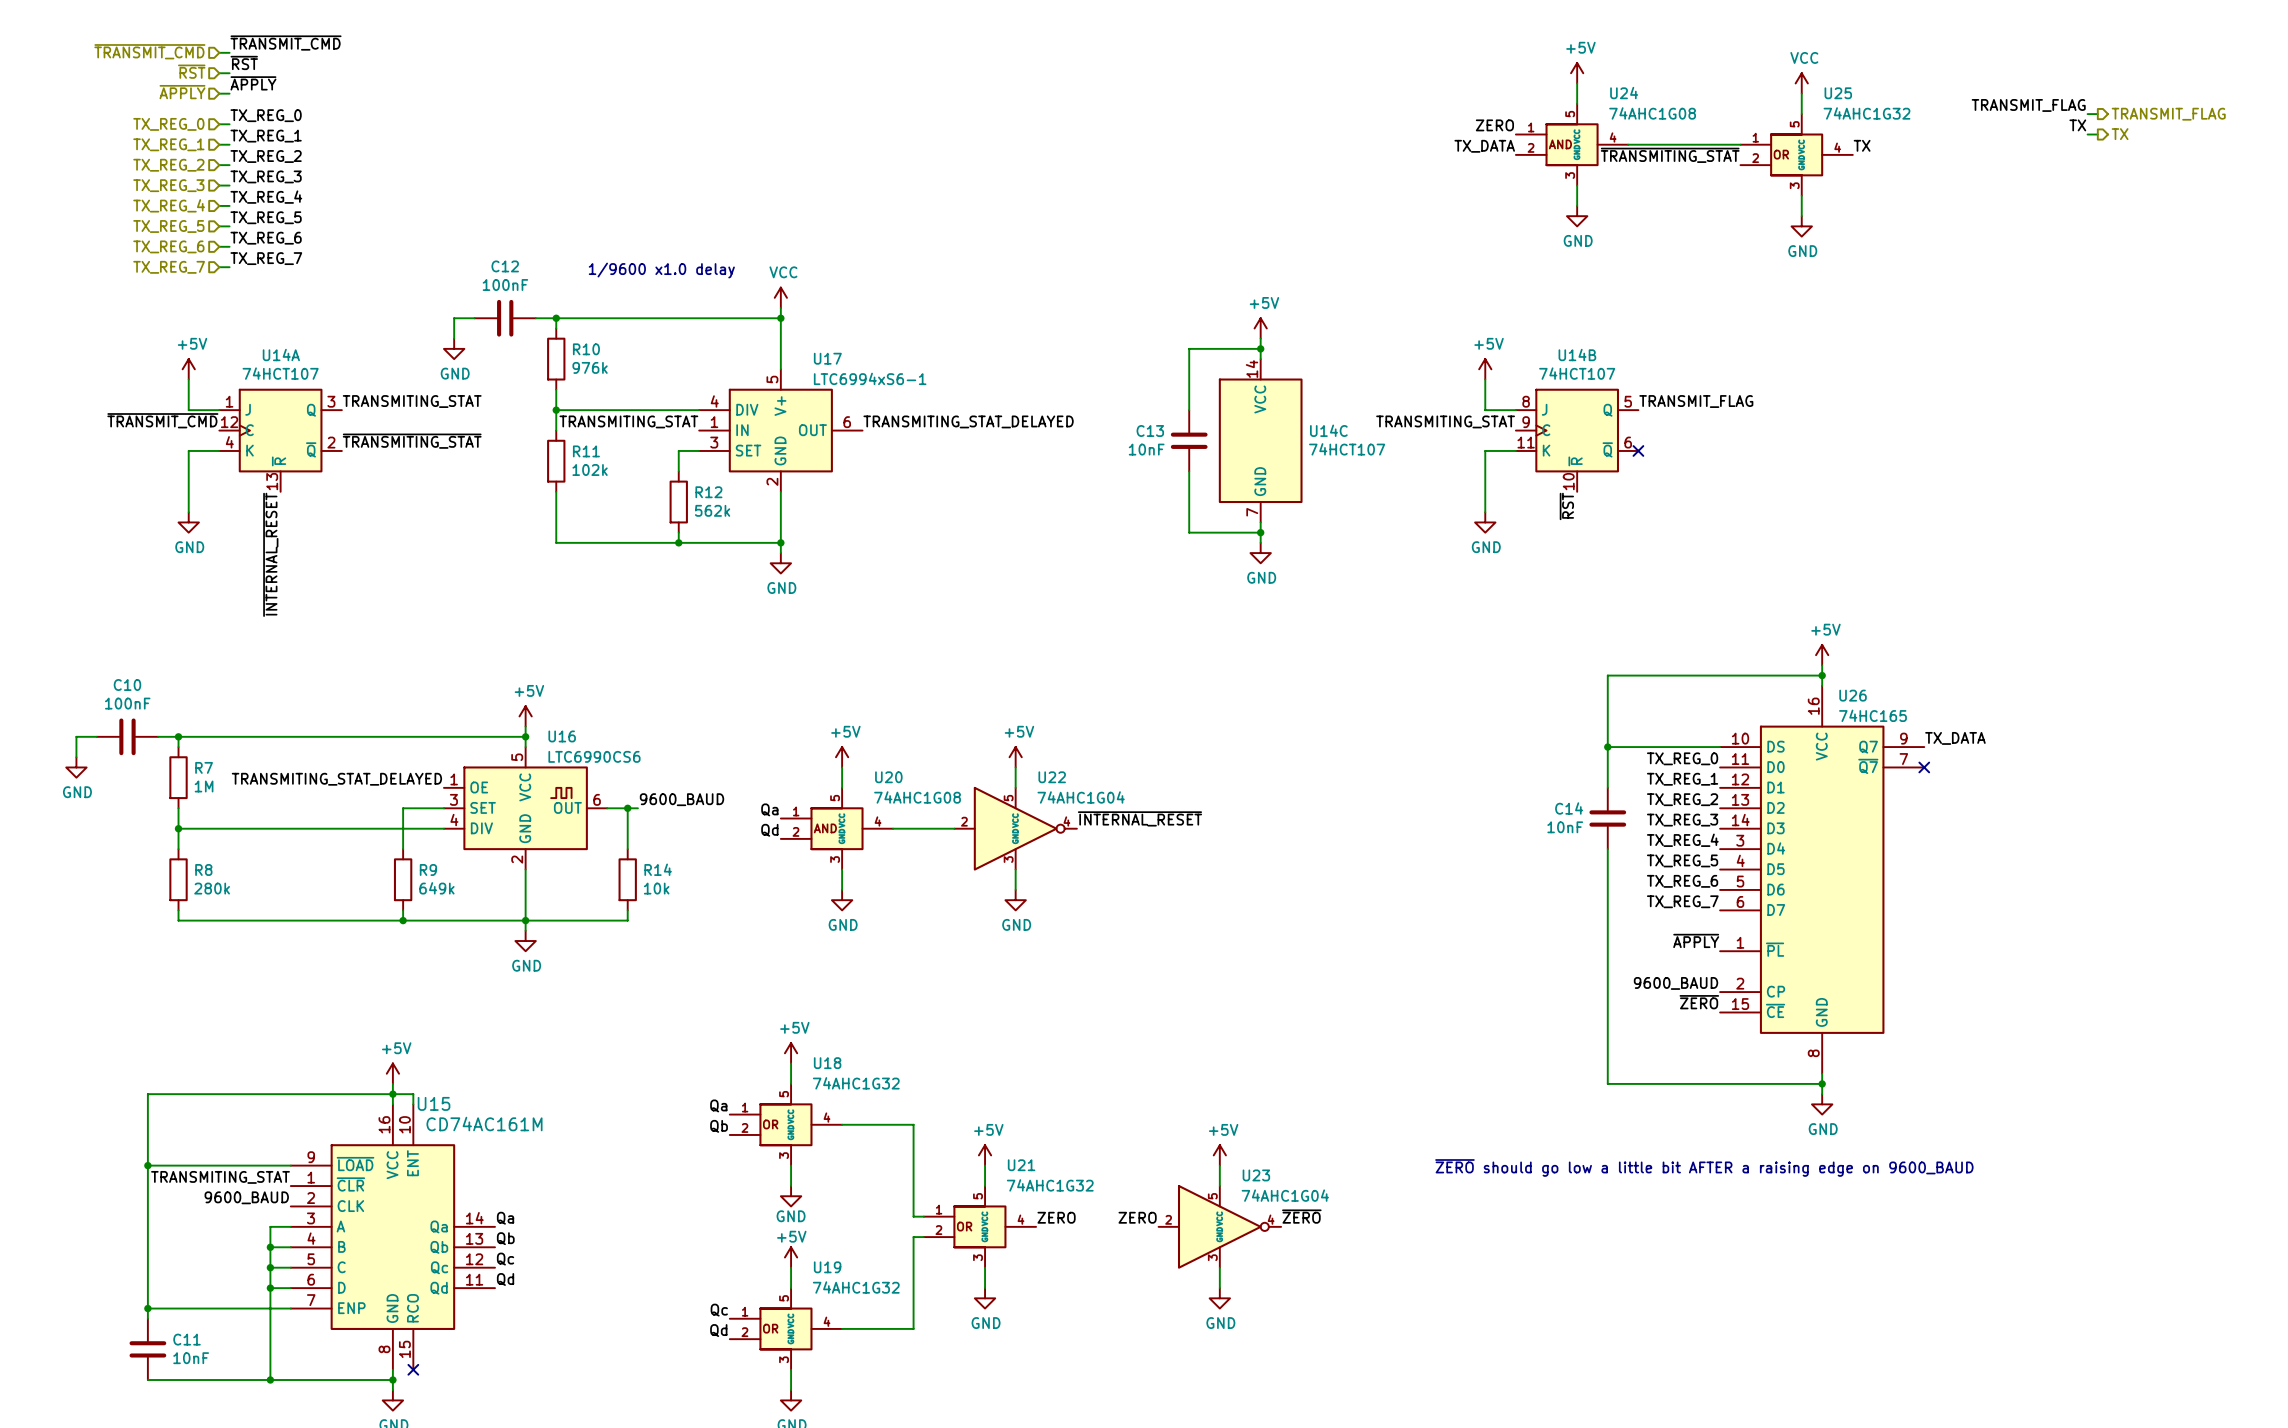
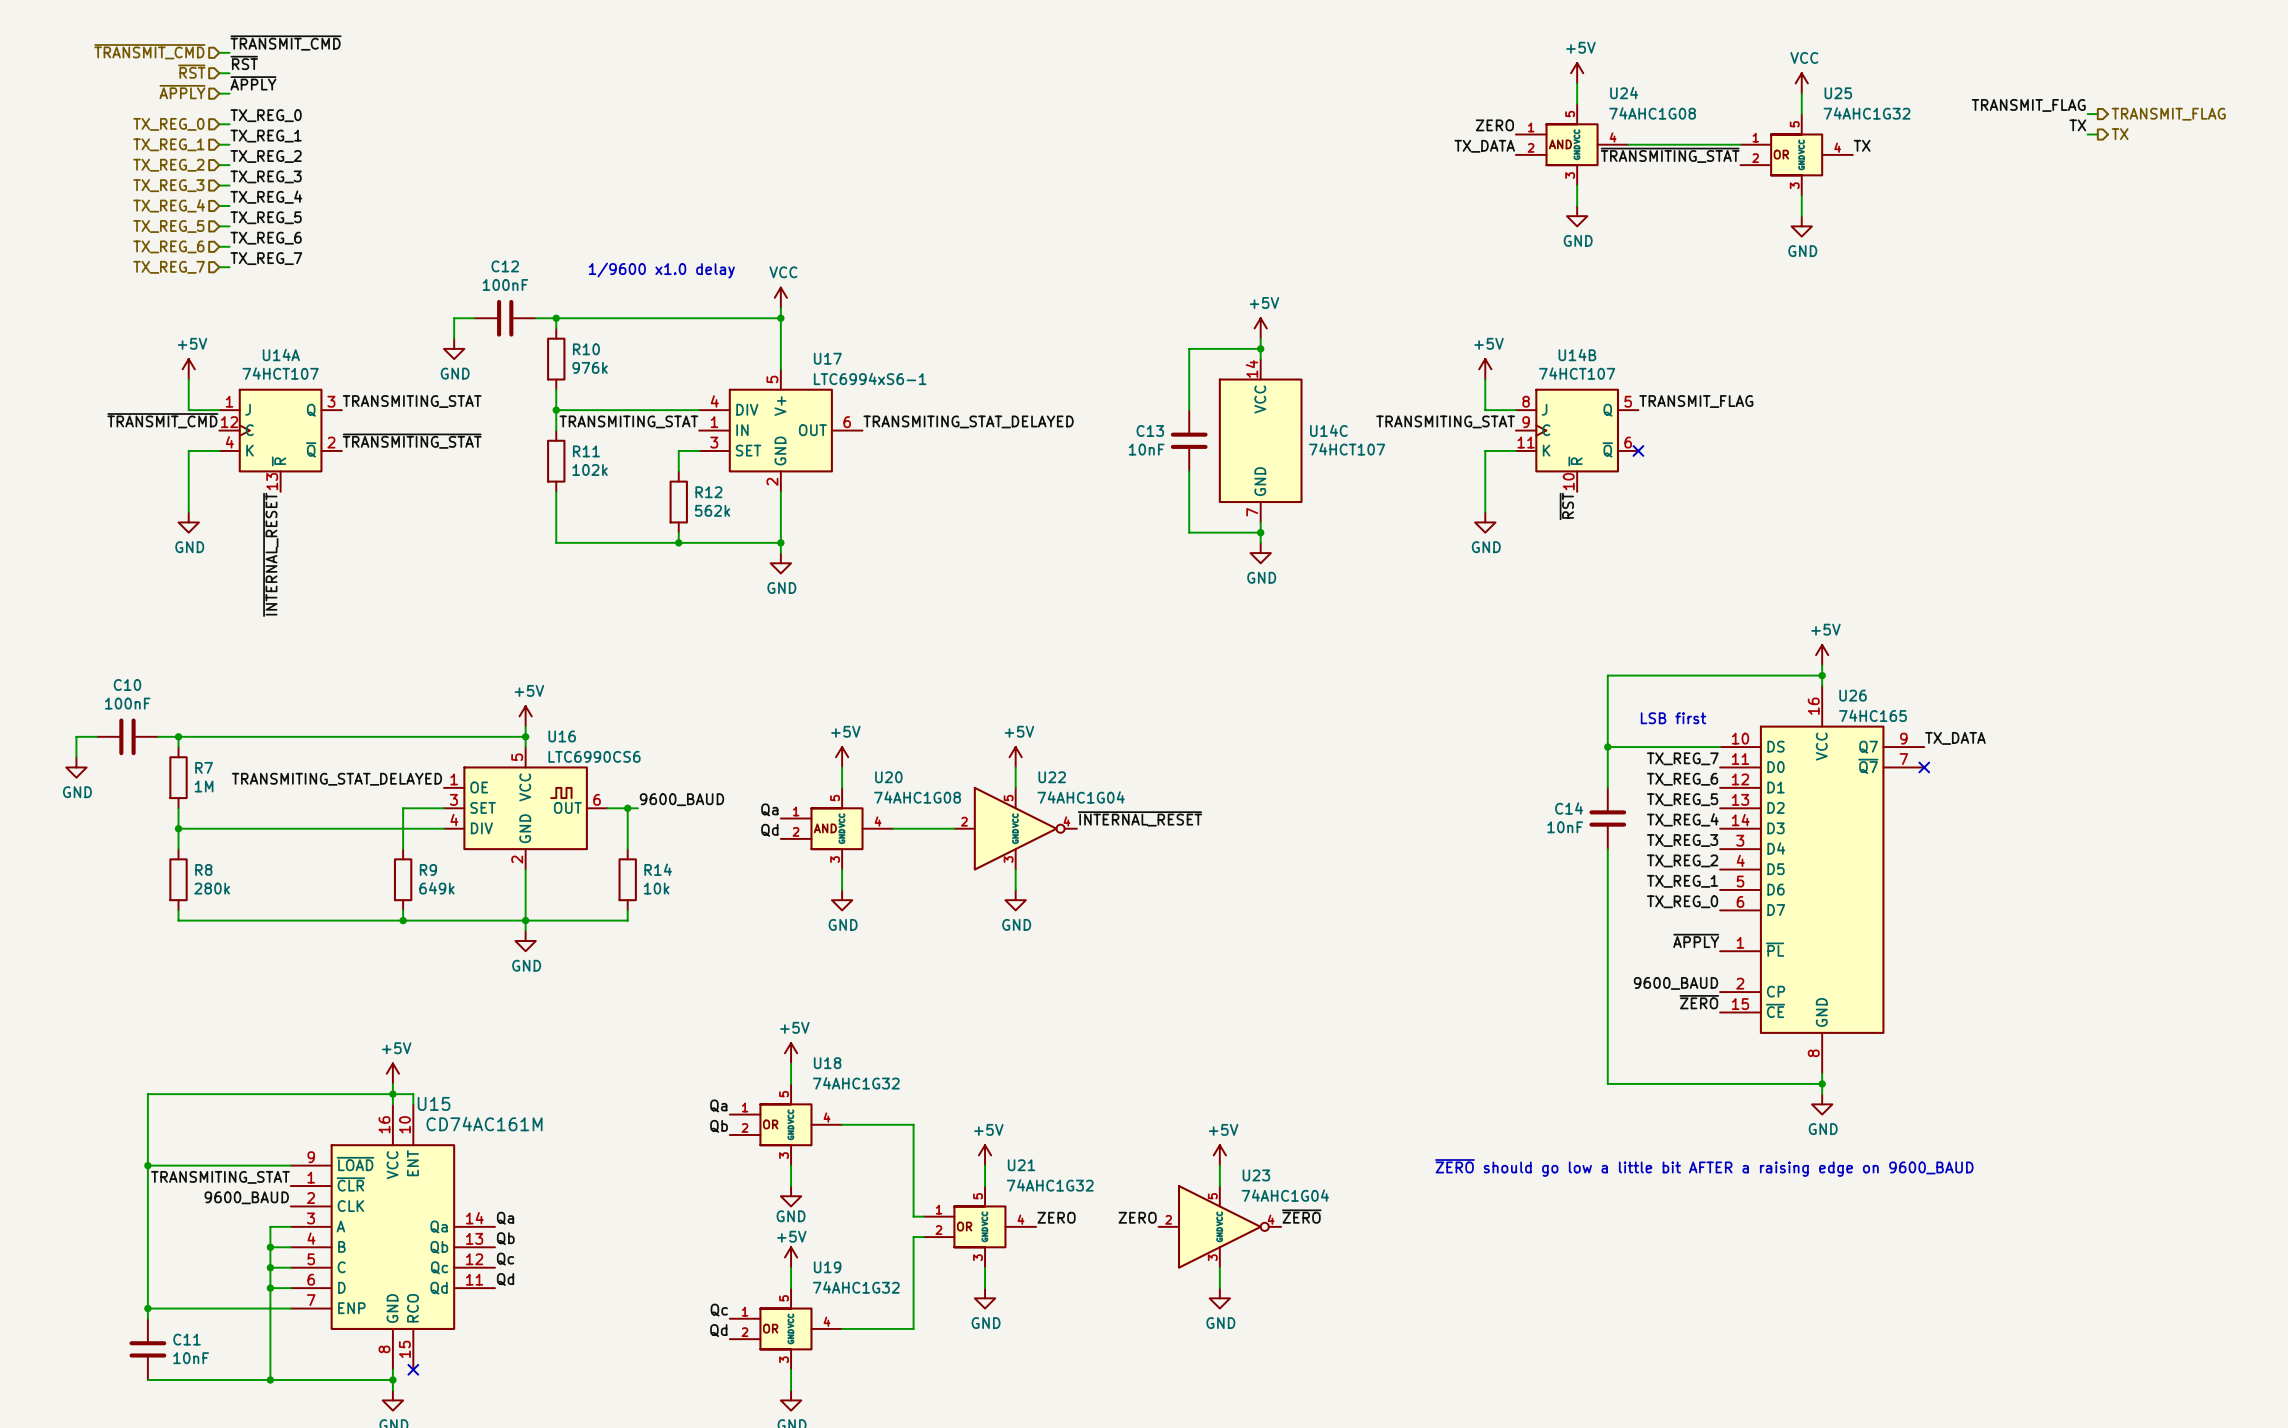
text: none -> LSB first (1673, 718)
label: TX_REG_0 (1682, 758) -> TX_REG_7 (1682, 758)
label: TX_REG_1 (1682, 779) -> TX_REG_6 (1682, 779)
label: TX_REG_2 (1682, 799) -> TX_REG_5 (1682, 799)
label: TX_REG_3 (1682, 820) -> TX_REG_4 (1682, 819)
label: TX_REG_4 (1682, 840) -> TX_REG_3 (1682, 840)
label: TX_REG_5 (1682, 860) -> TX_REG_2 (1682, 860)
label: TX_REG_6 (1682, 881) -> TX_REG_1 (1682, 881)
label: TX_REG_7 (1682, 901) -> TX_REG_0 (1682, 901)

